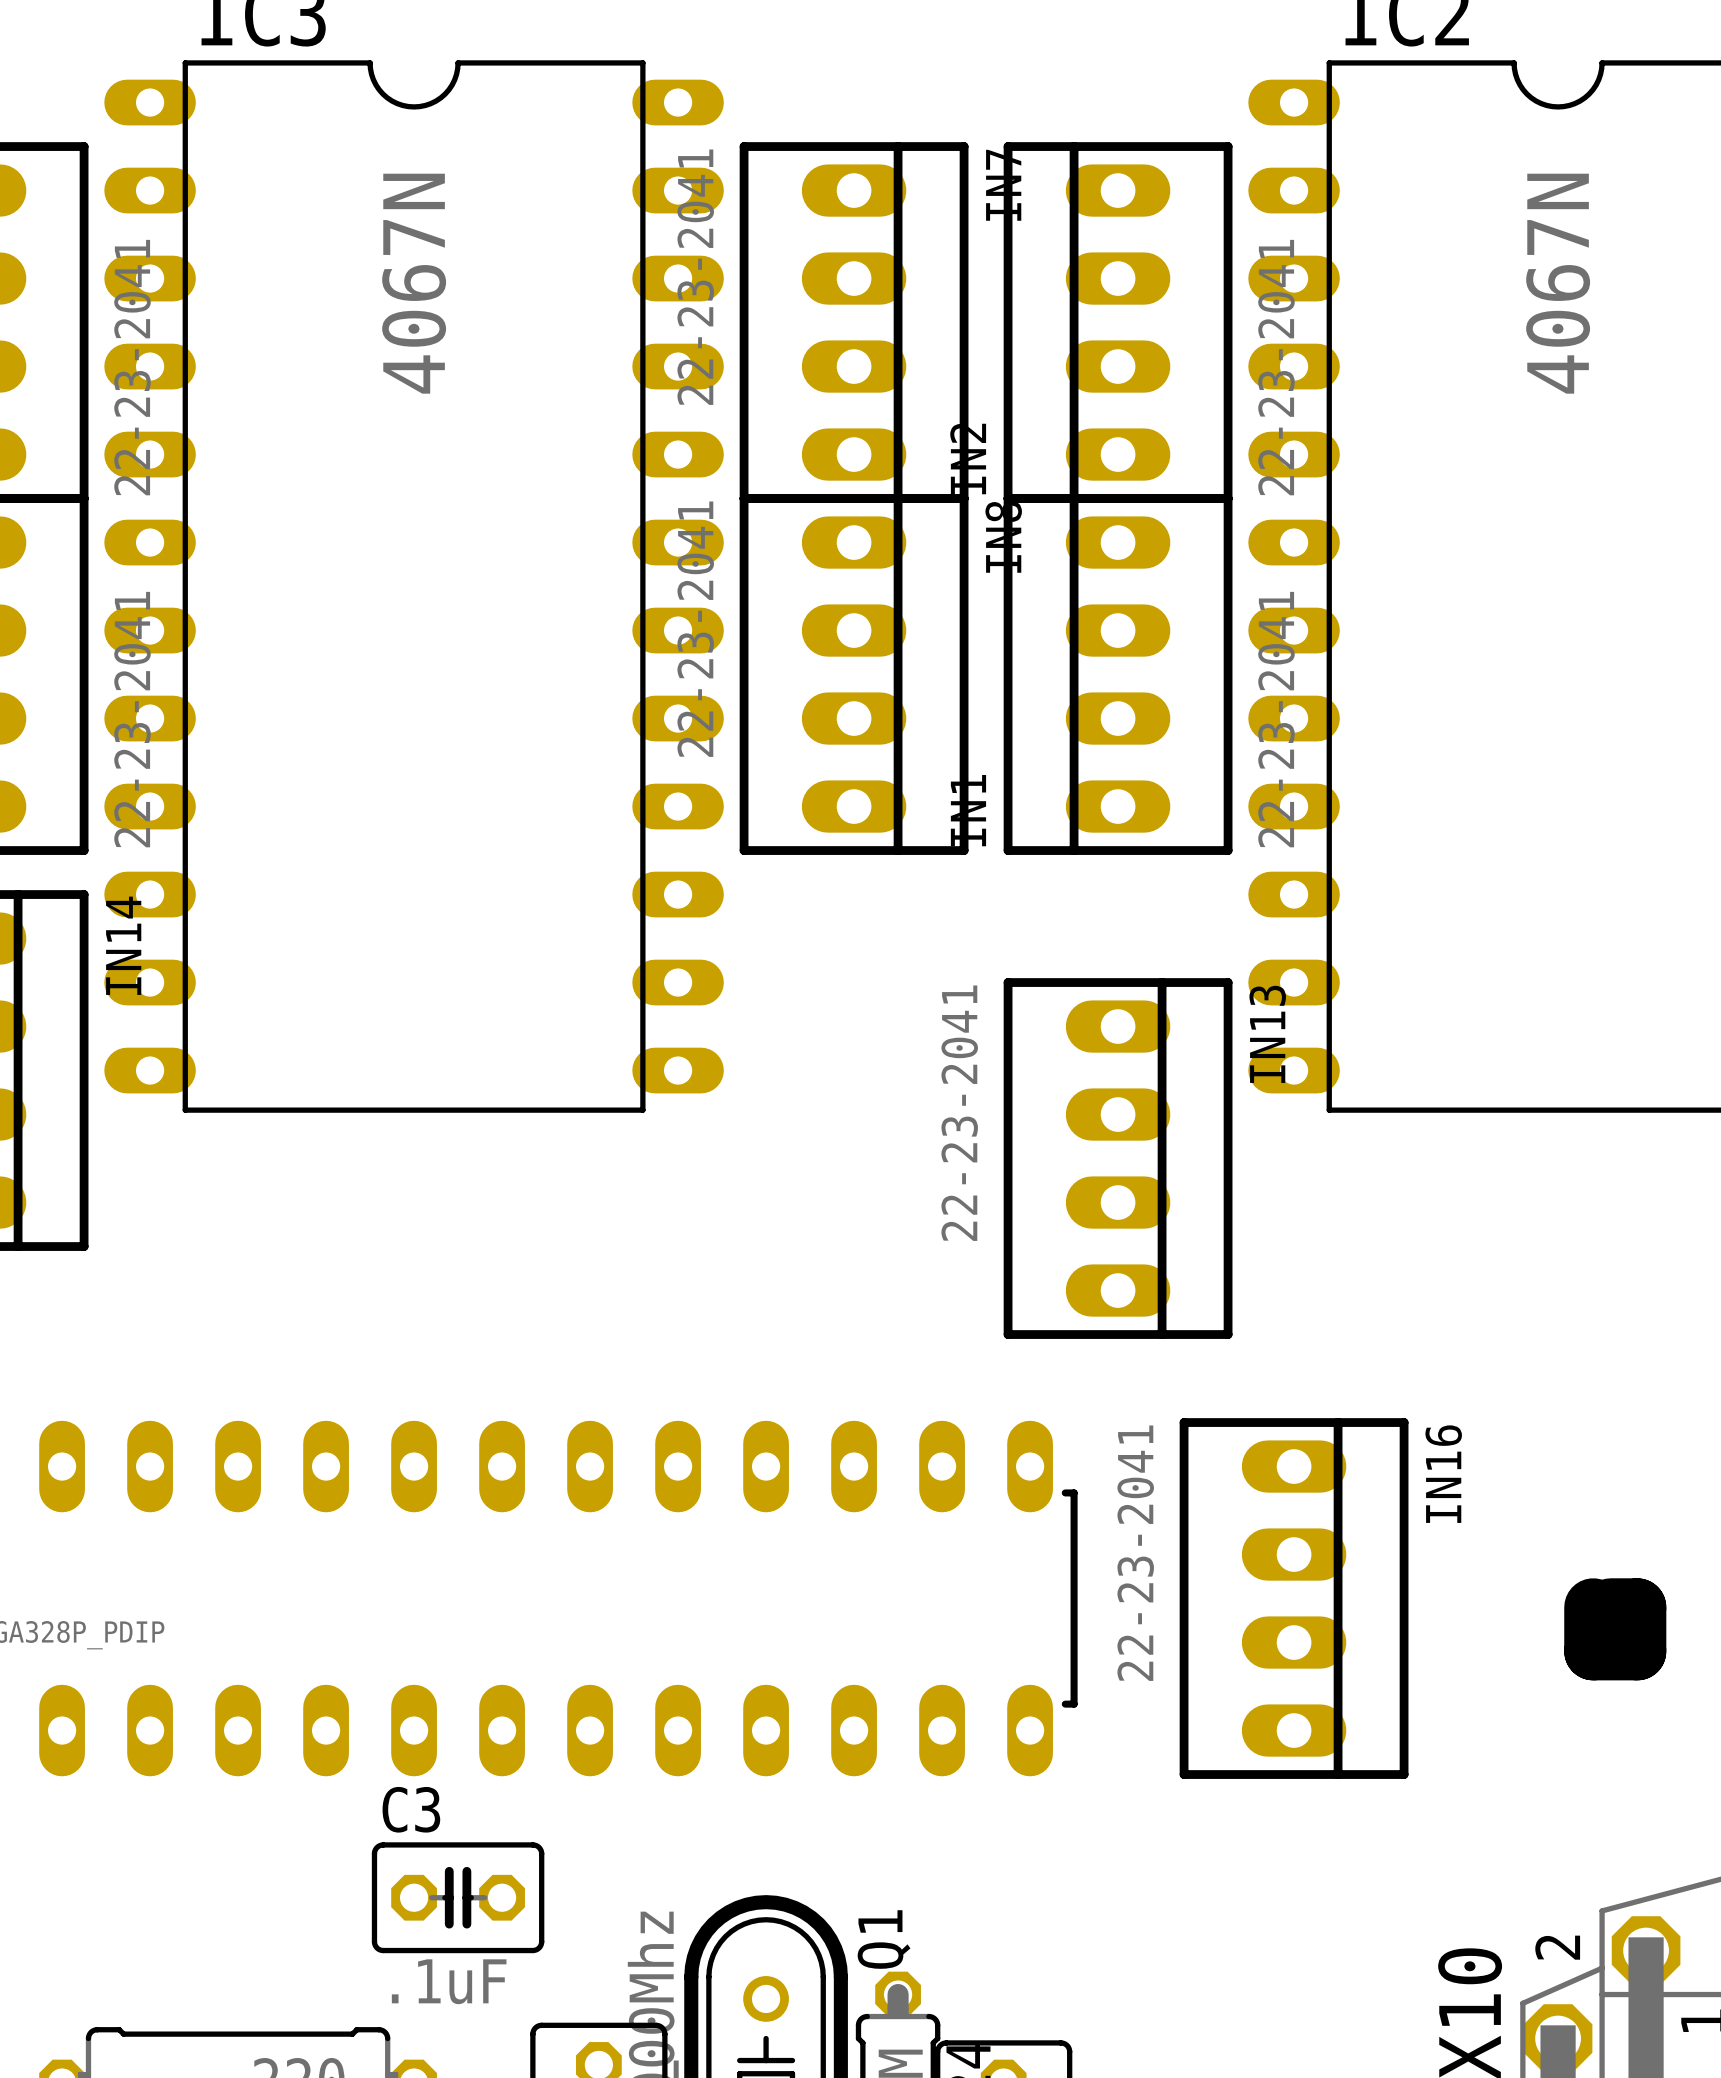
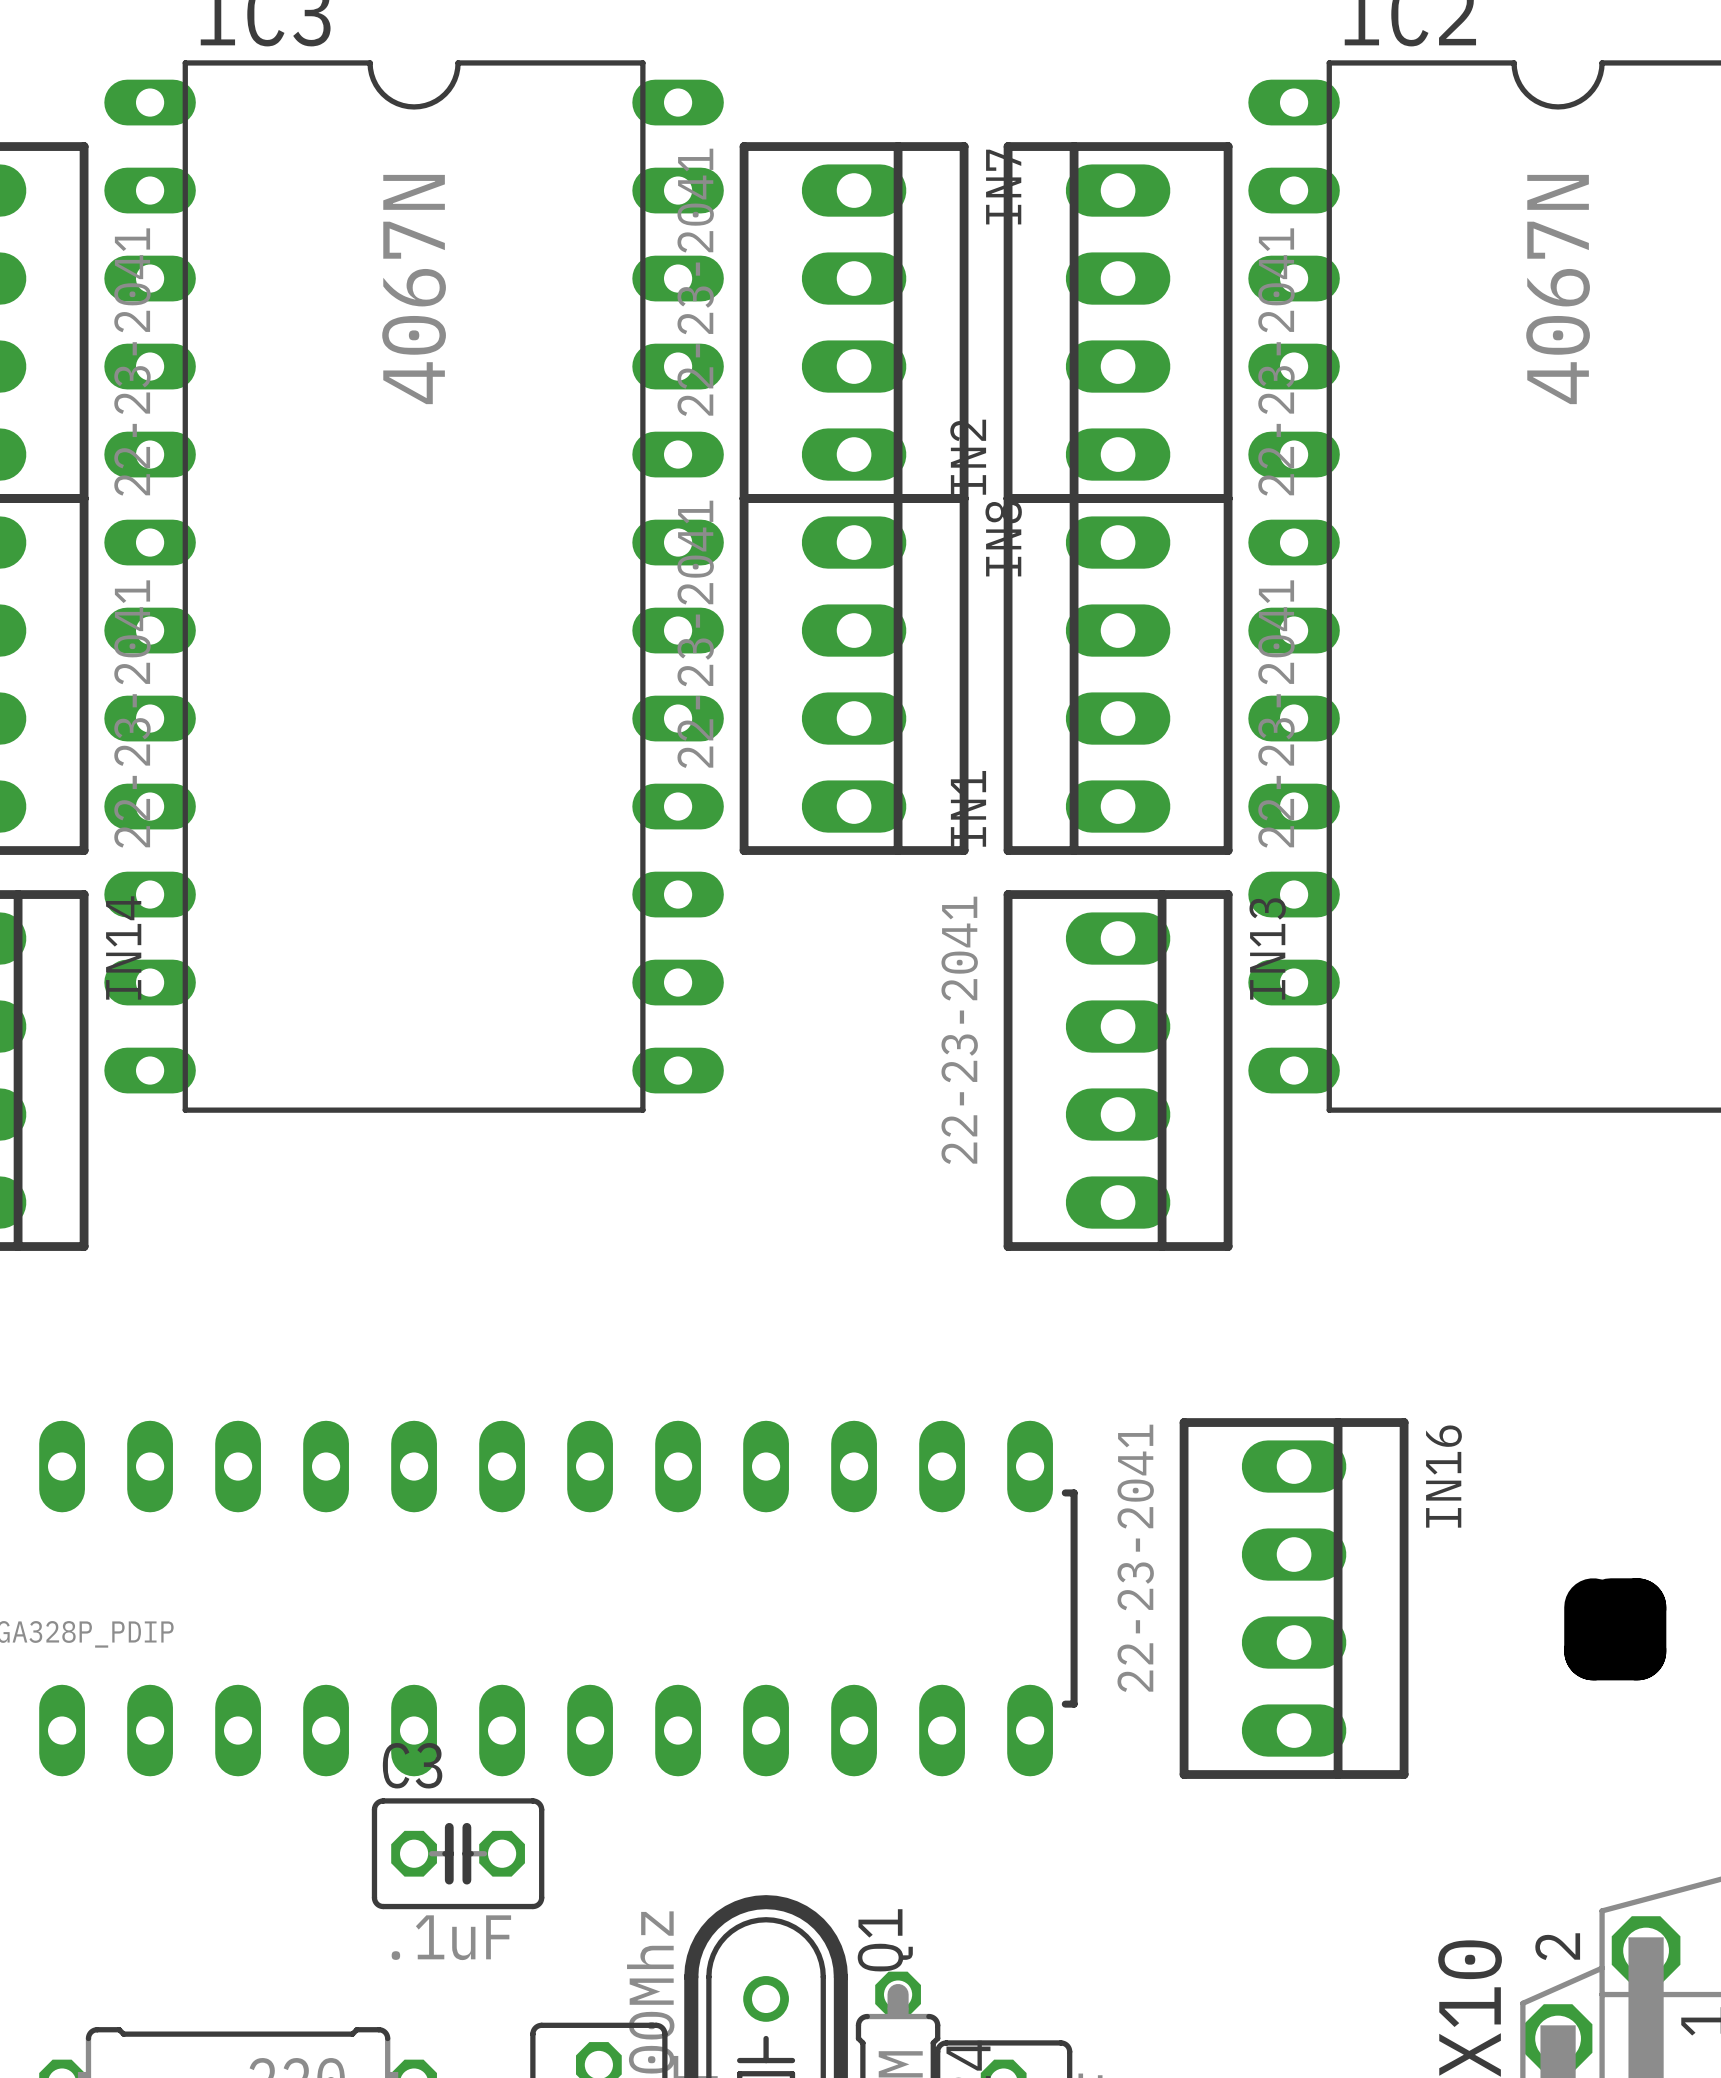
IN13 position: (1118, 1158) -> (1118, 1070)
C3 position: (458, 1897) -> (458, 1853)

